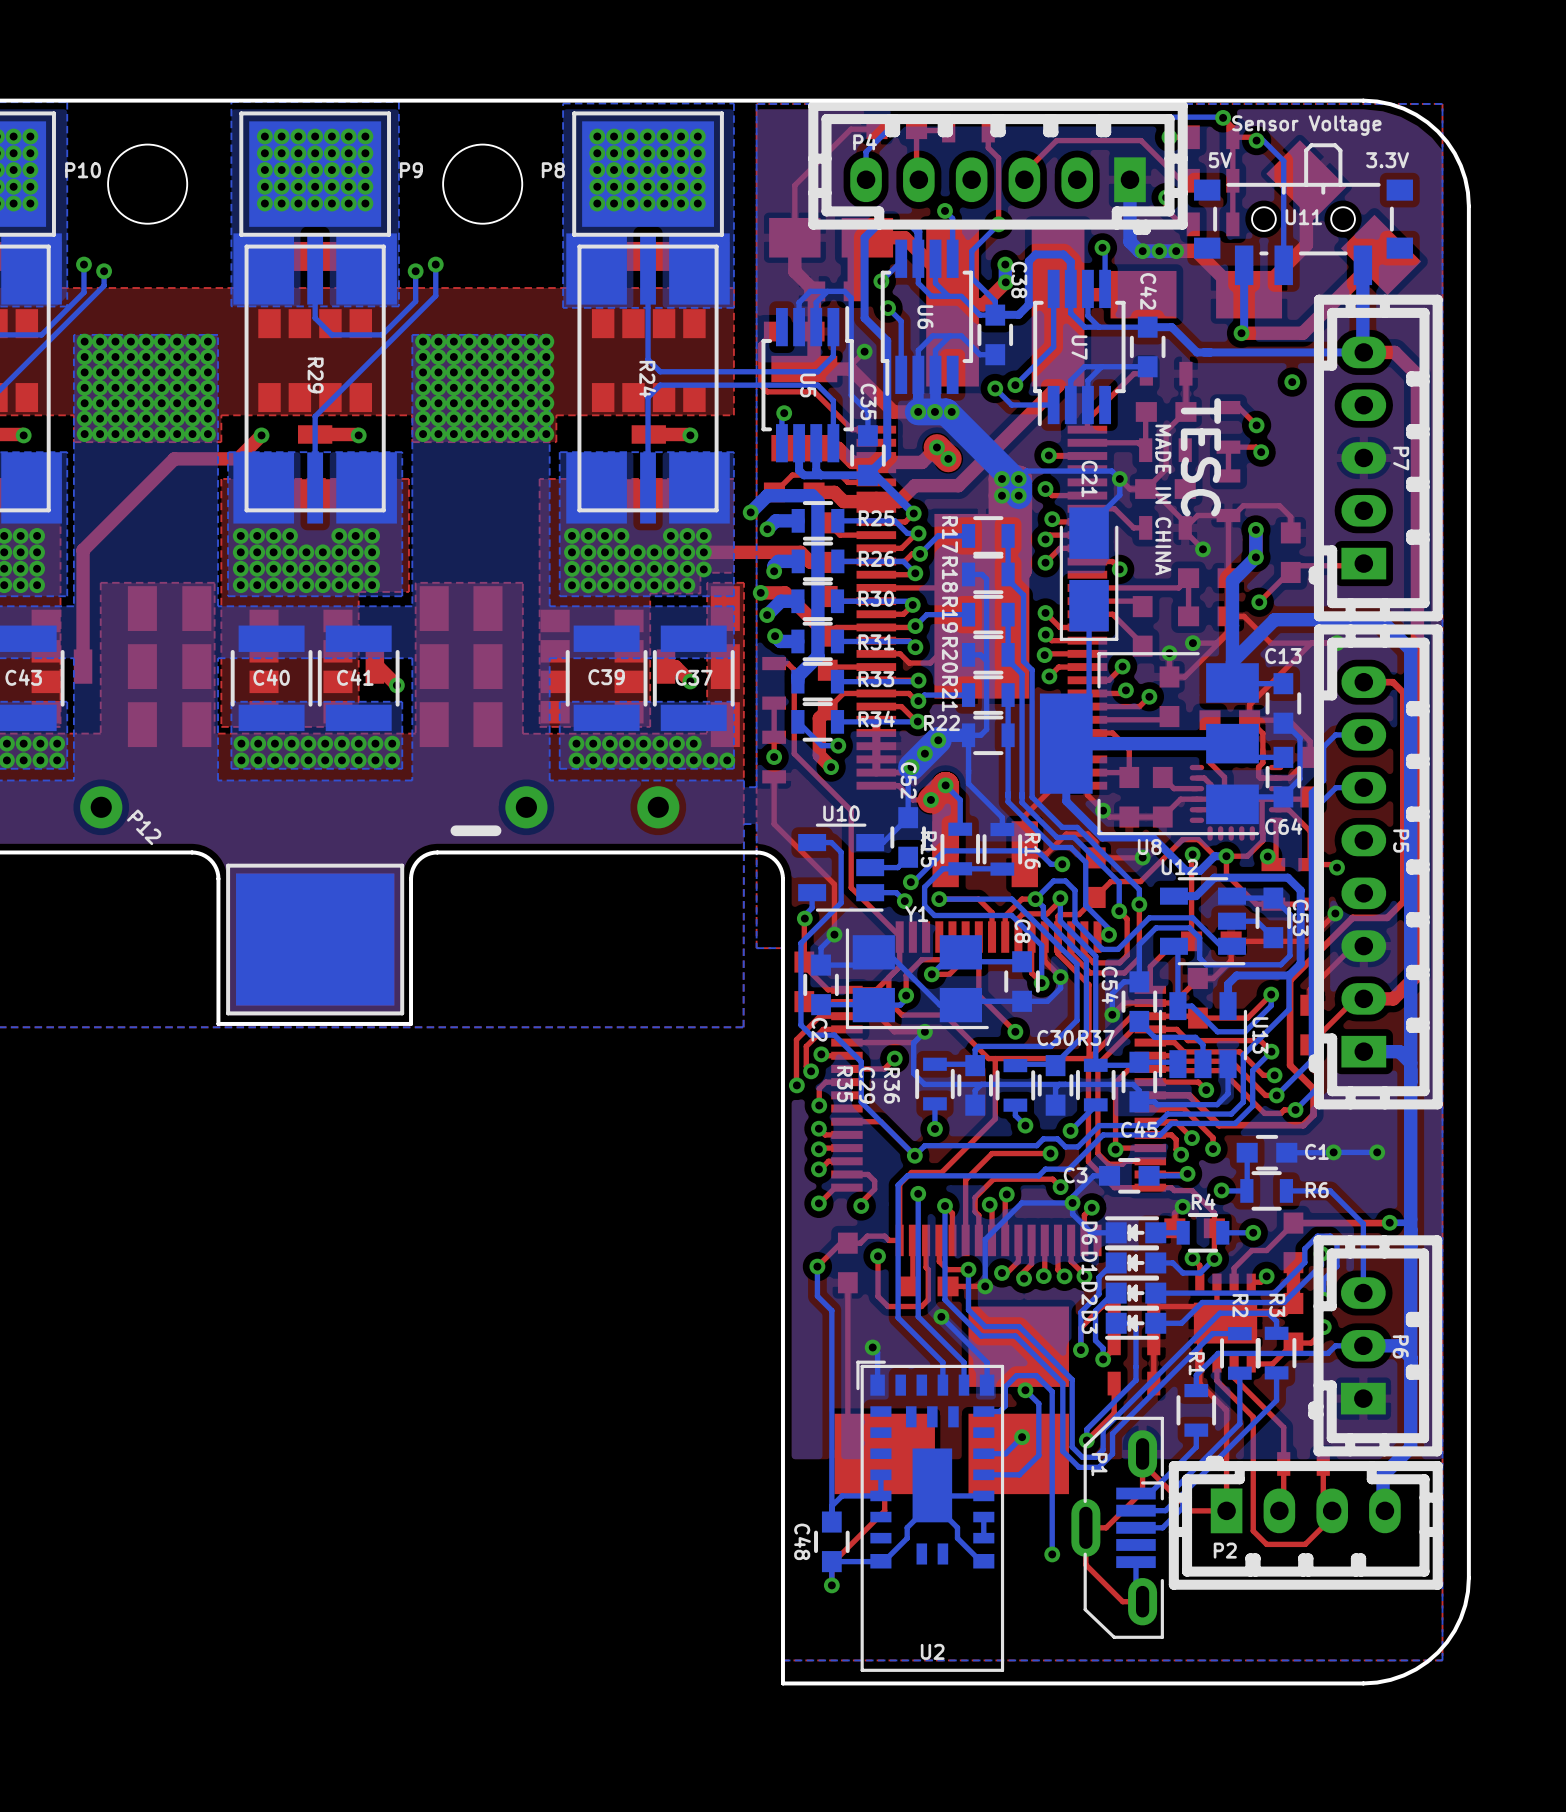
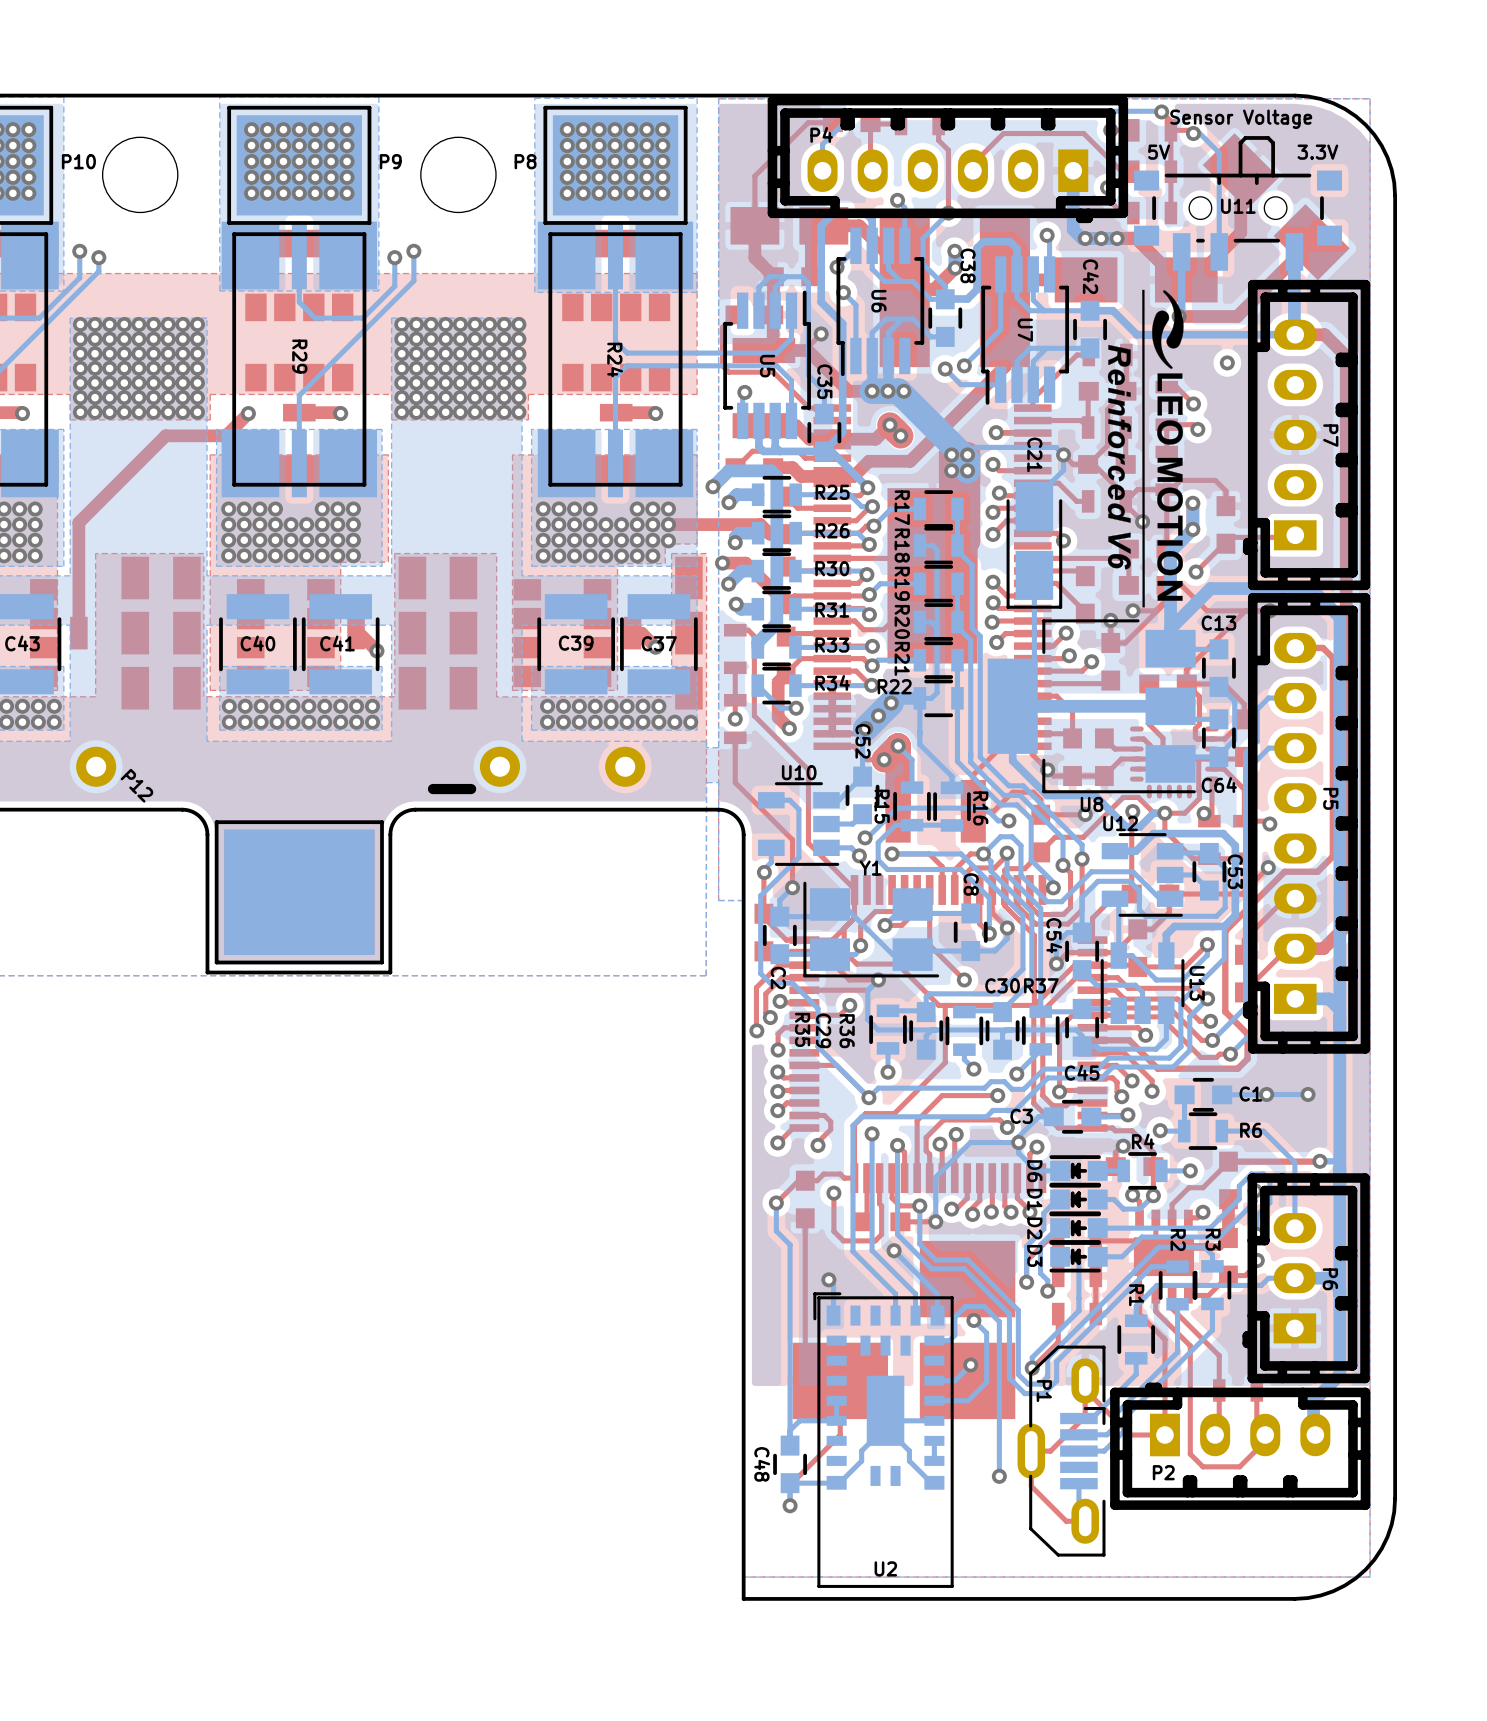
drawing: none -> [1107, 289, 1184, 608]
text: TESC (1200, 457) -> none
text: MADE IN CHINA (1163, 500) -> none

